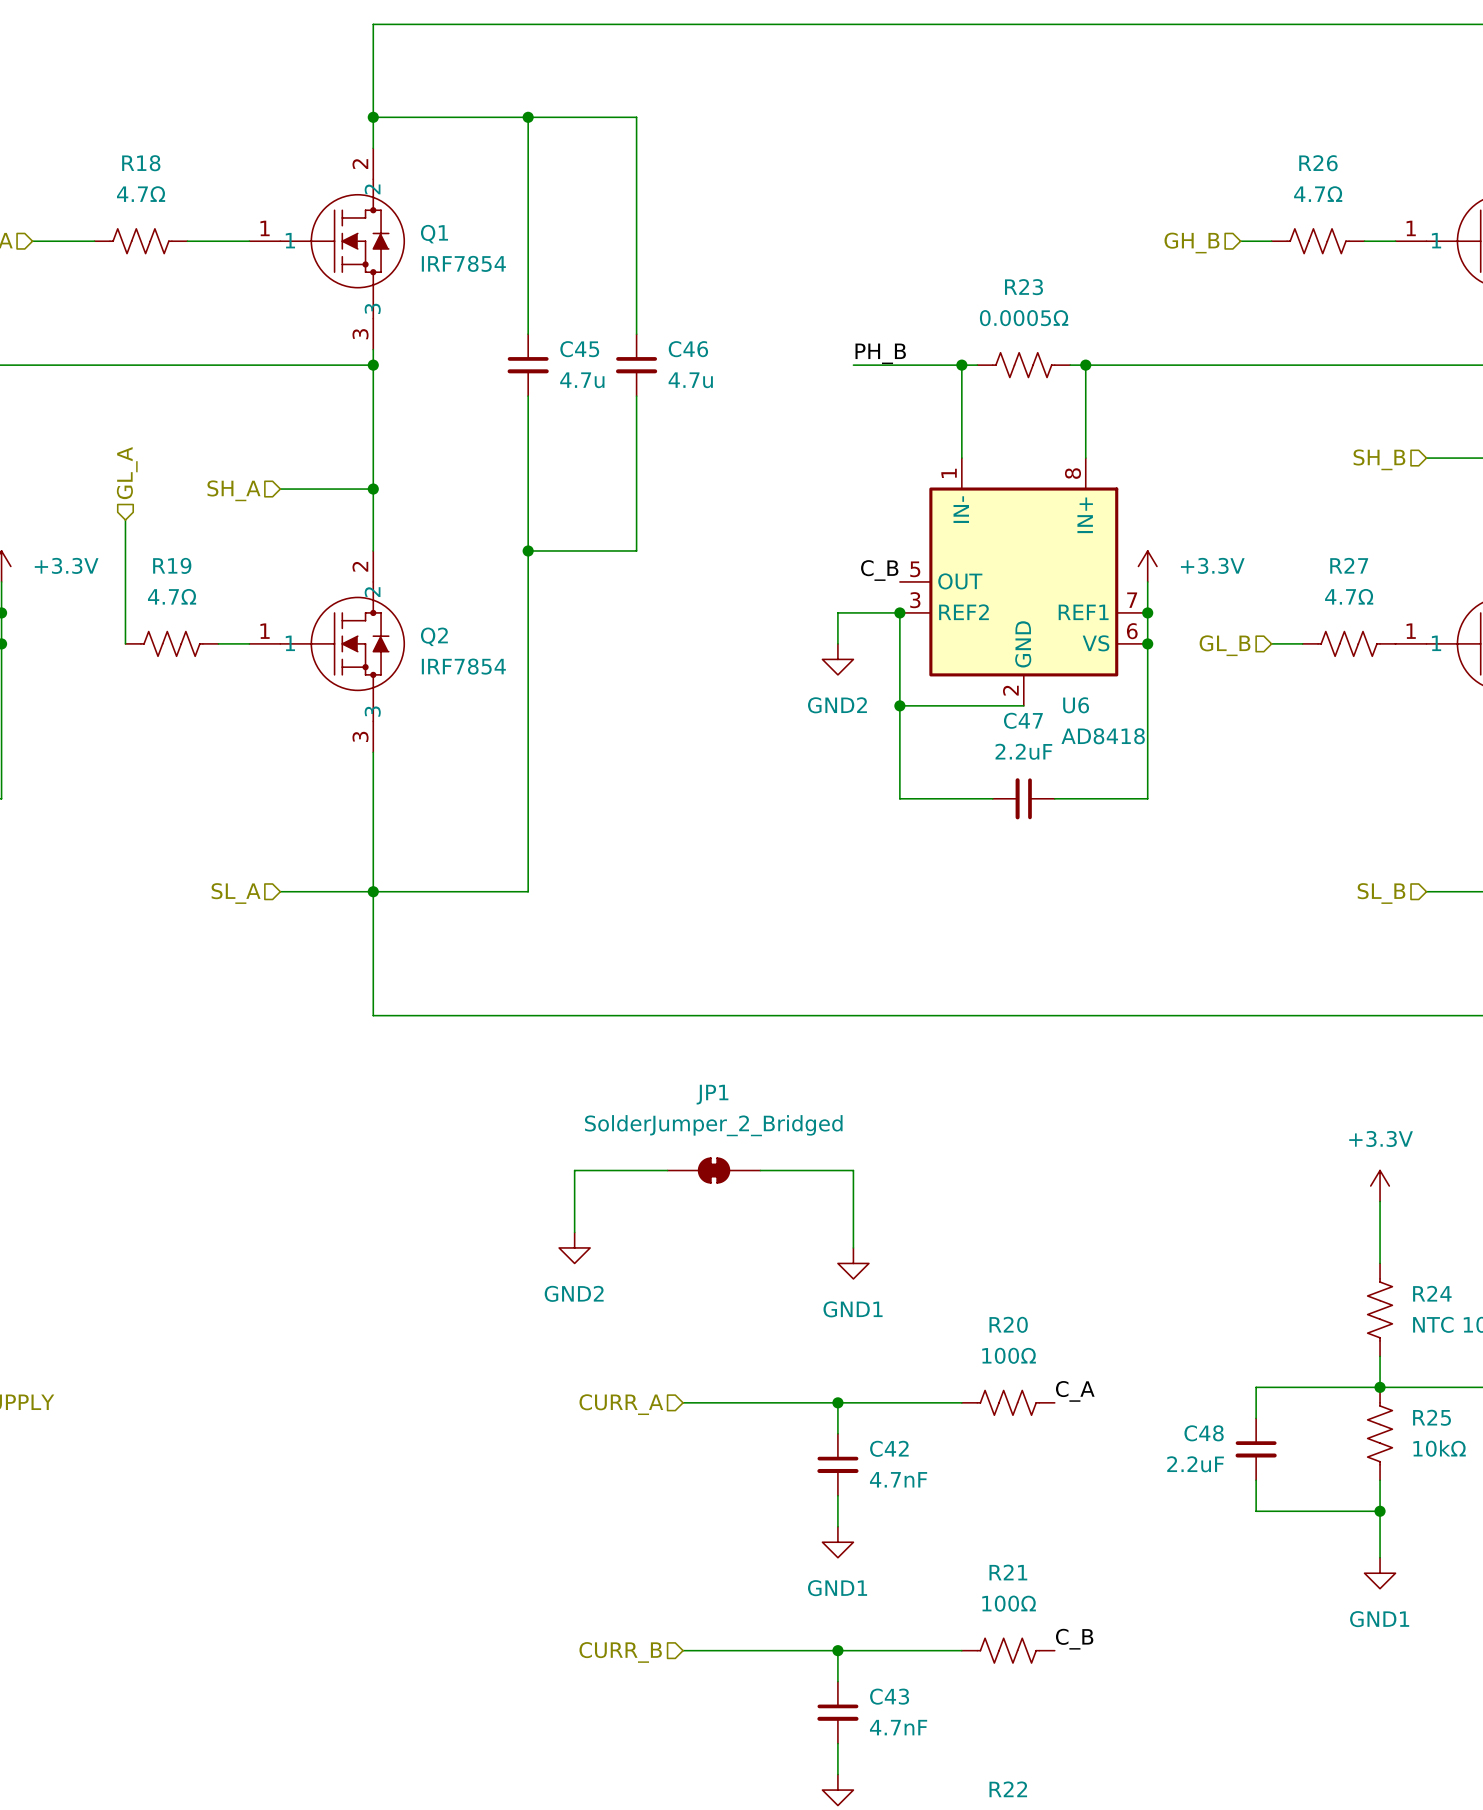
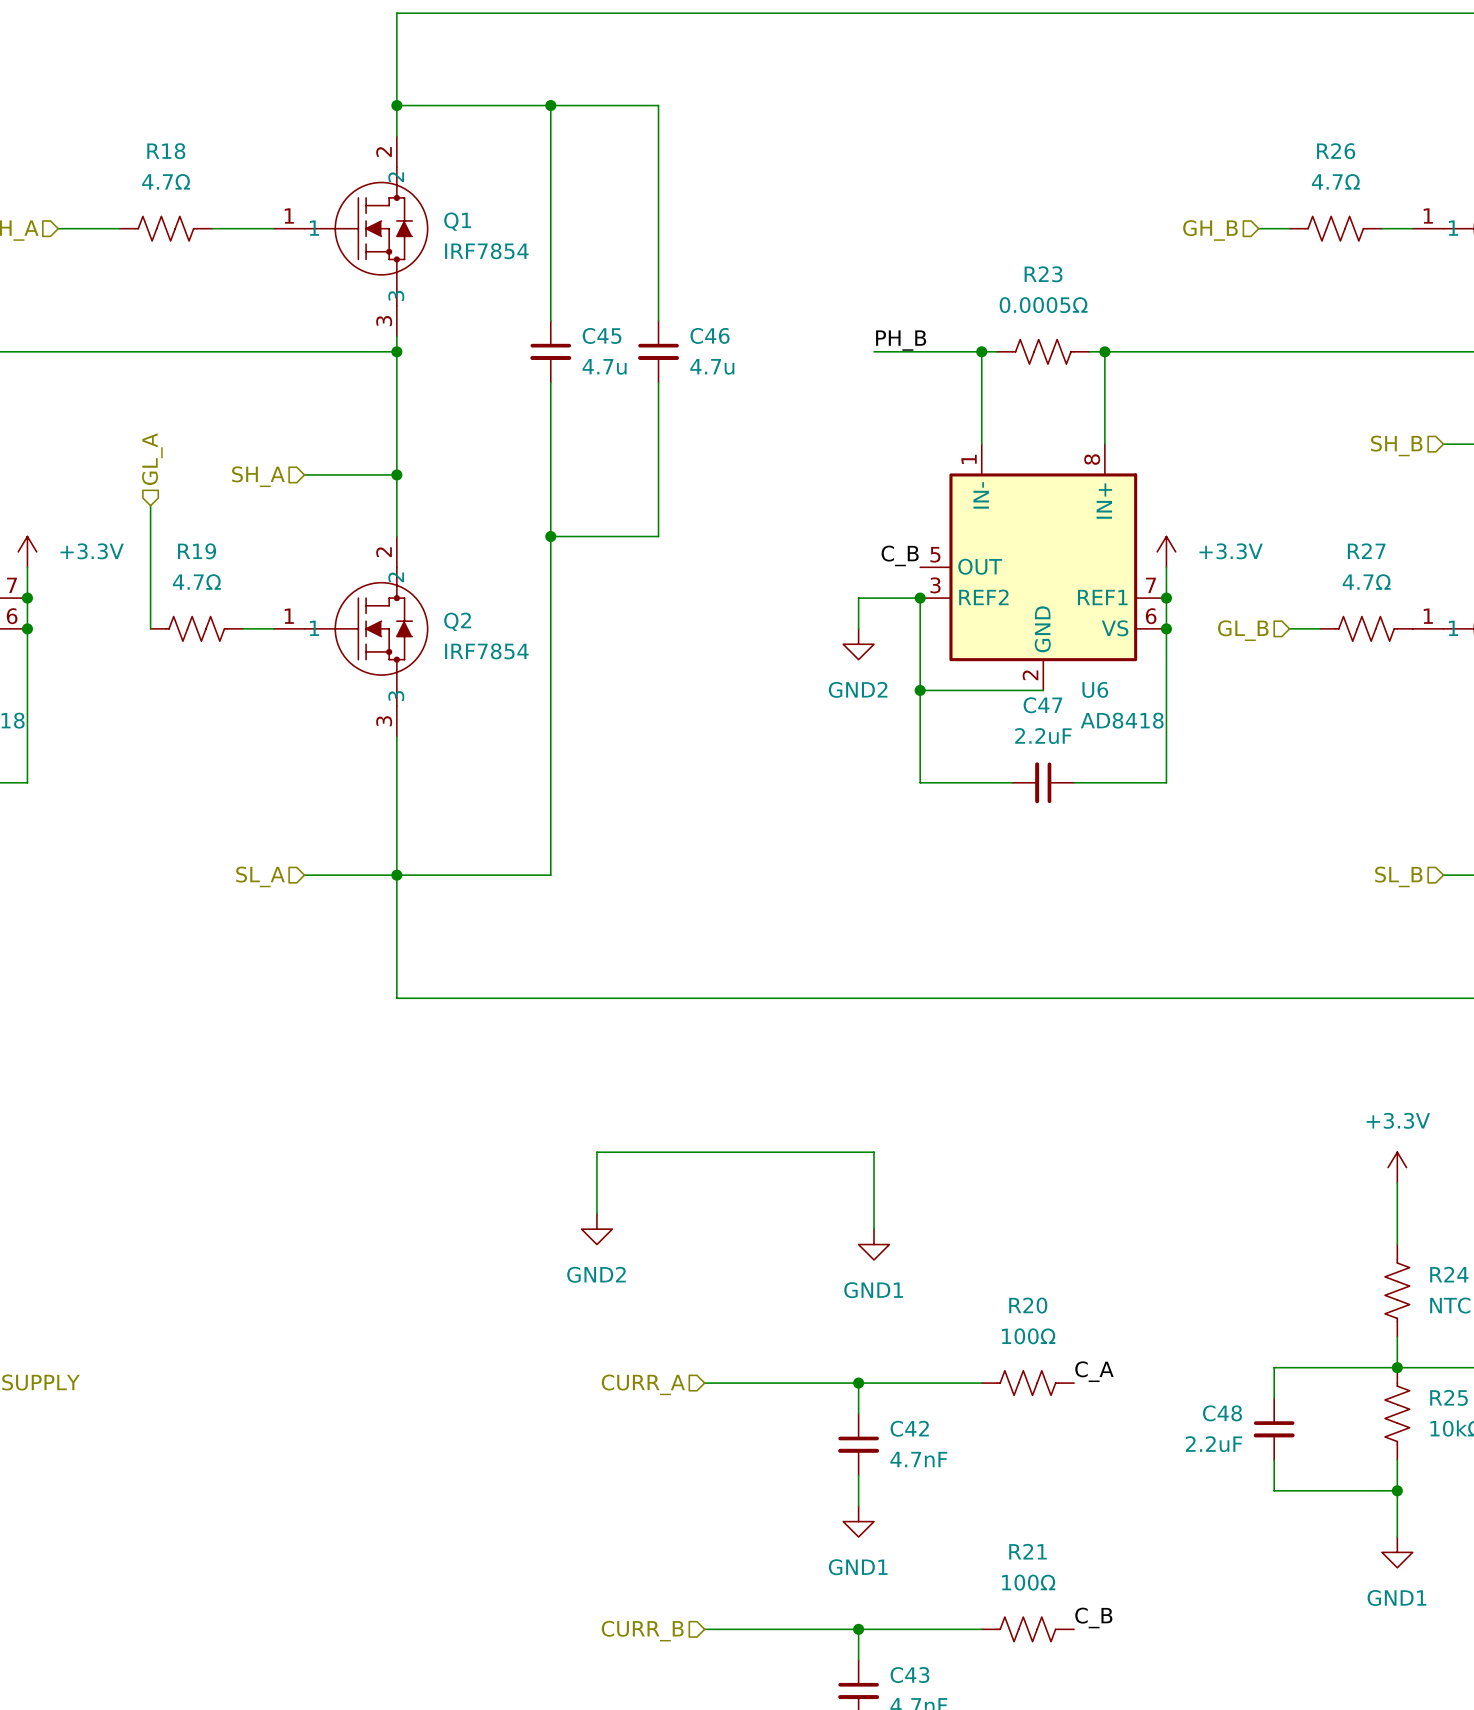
JP1: SolderJumper_2_Bridged (714, 1170) -> none

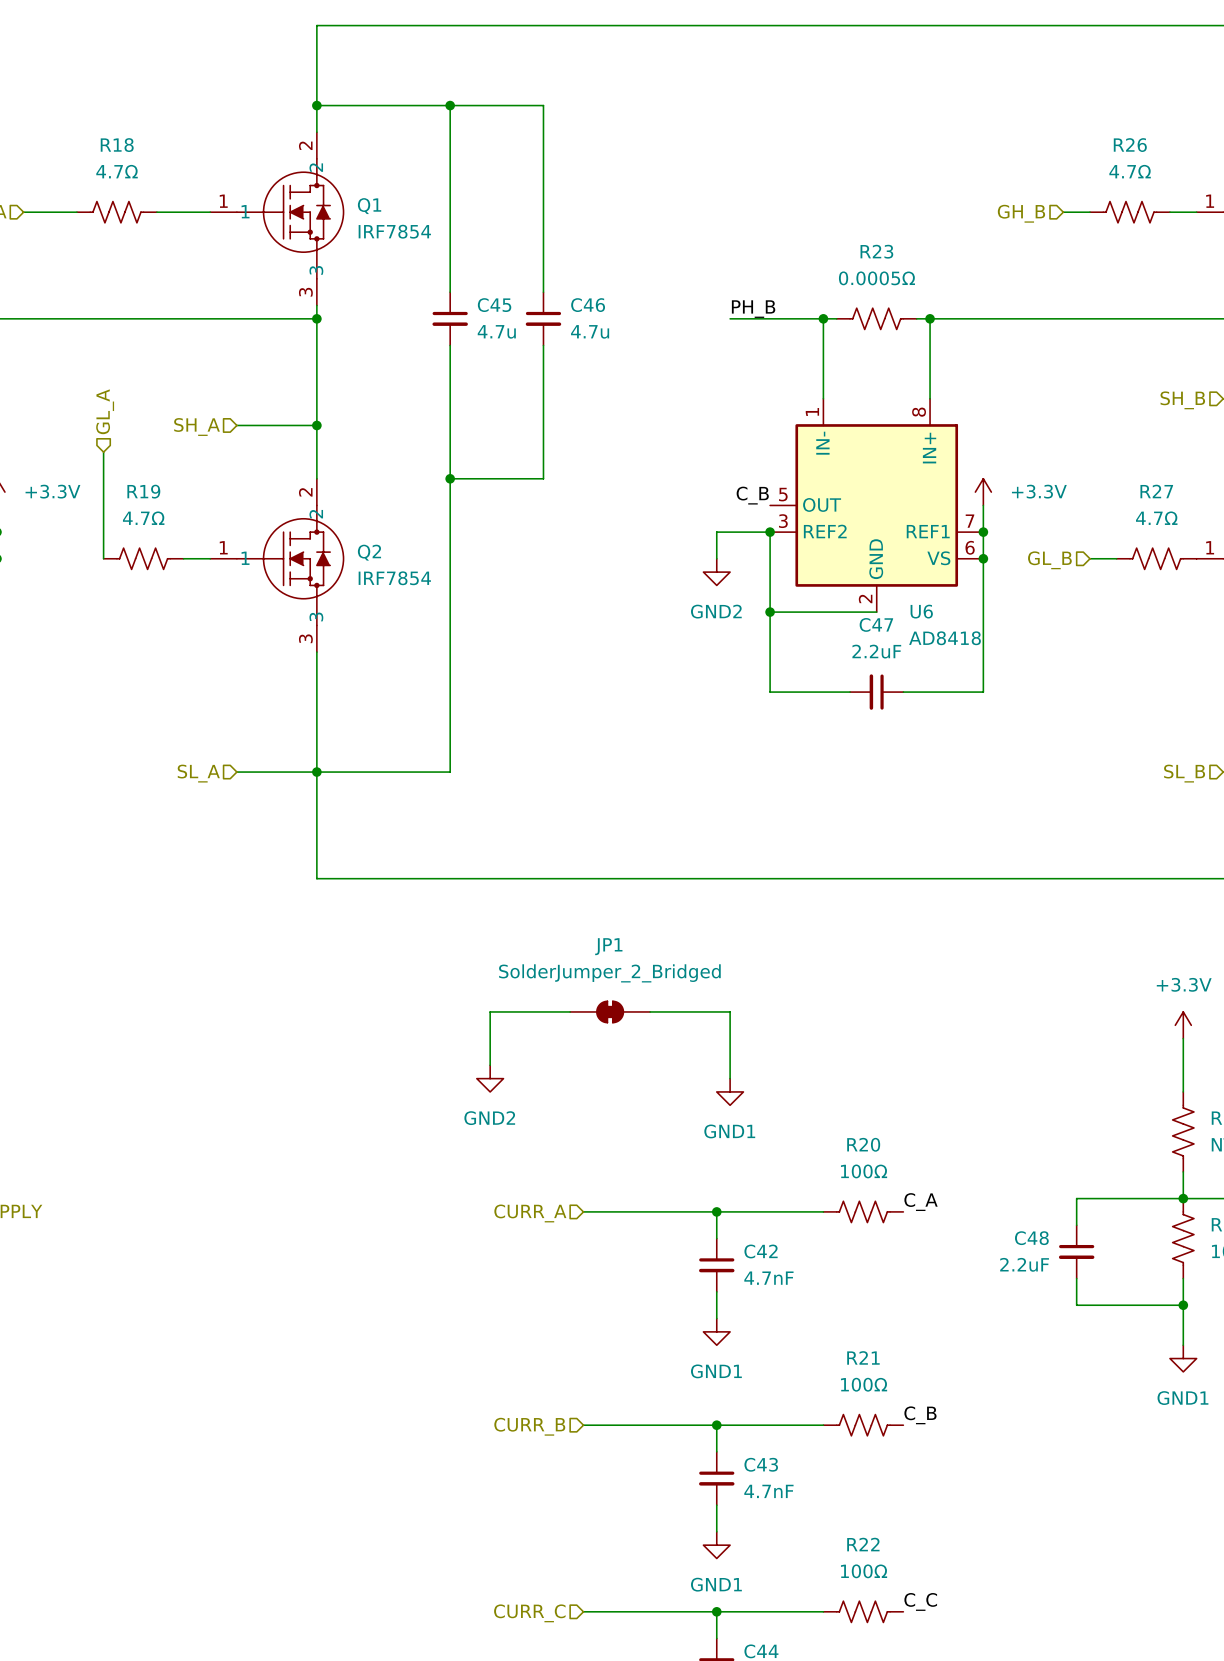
JP1: none -> SolderJumper_2_Bridged (610, 1011)

